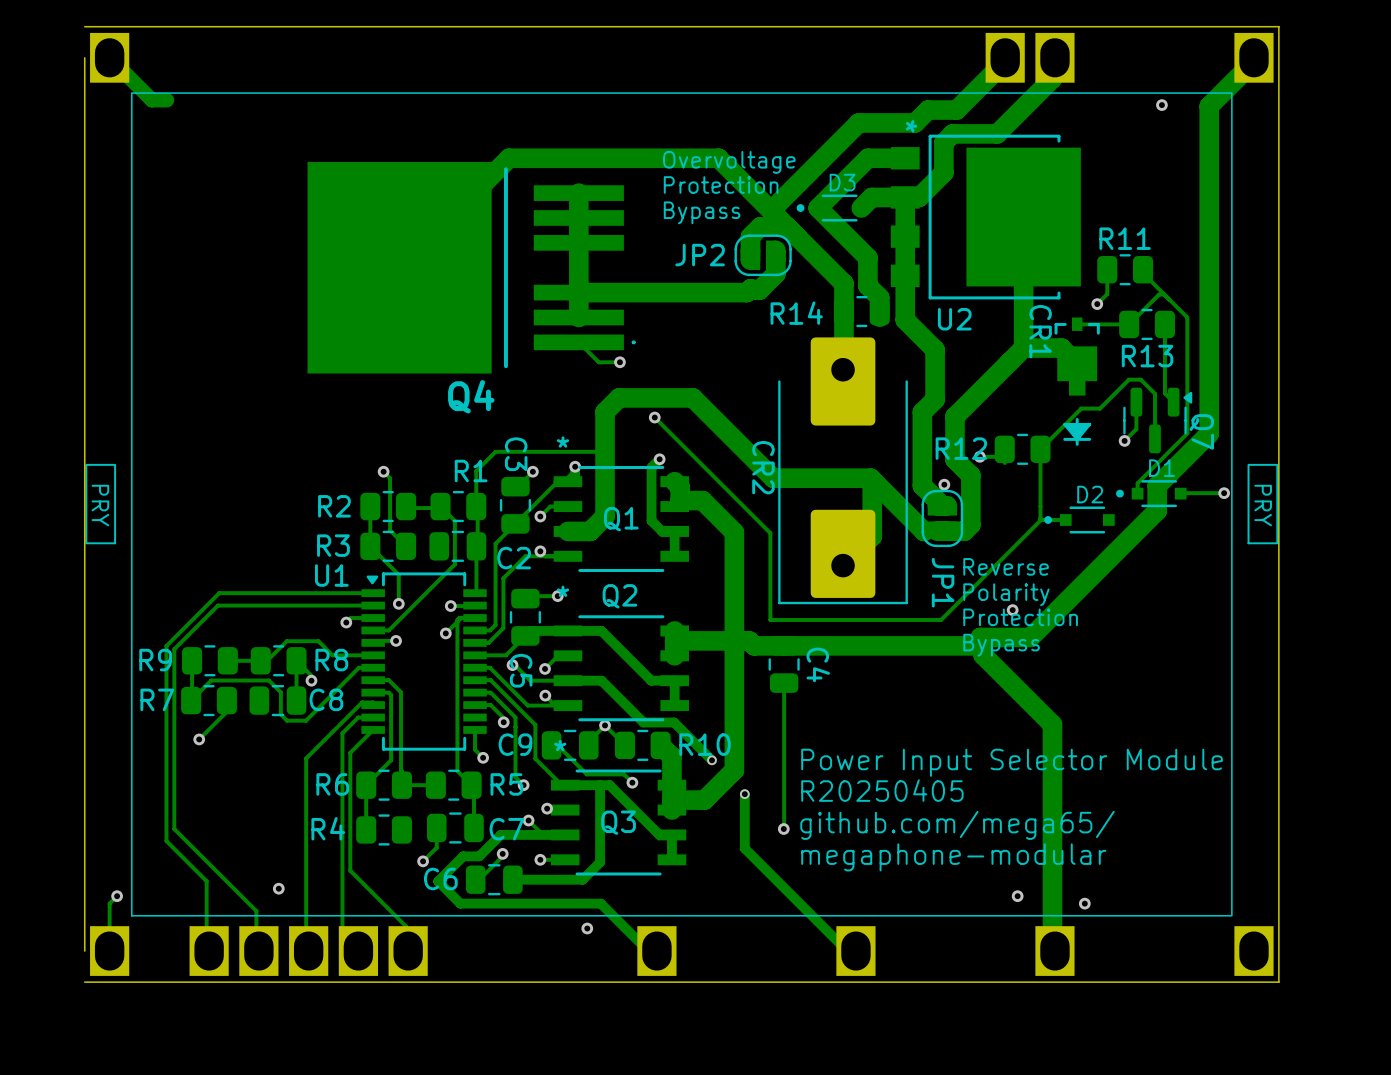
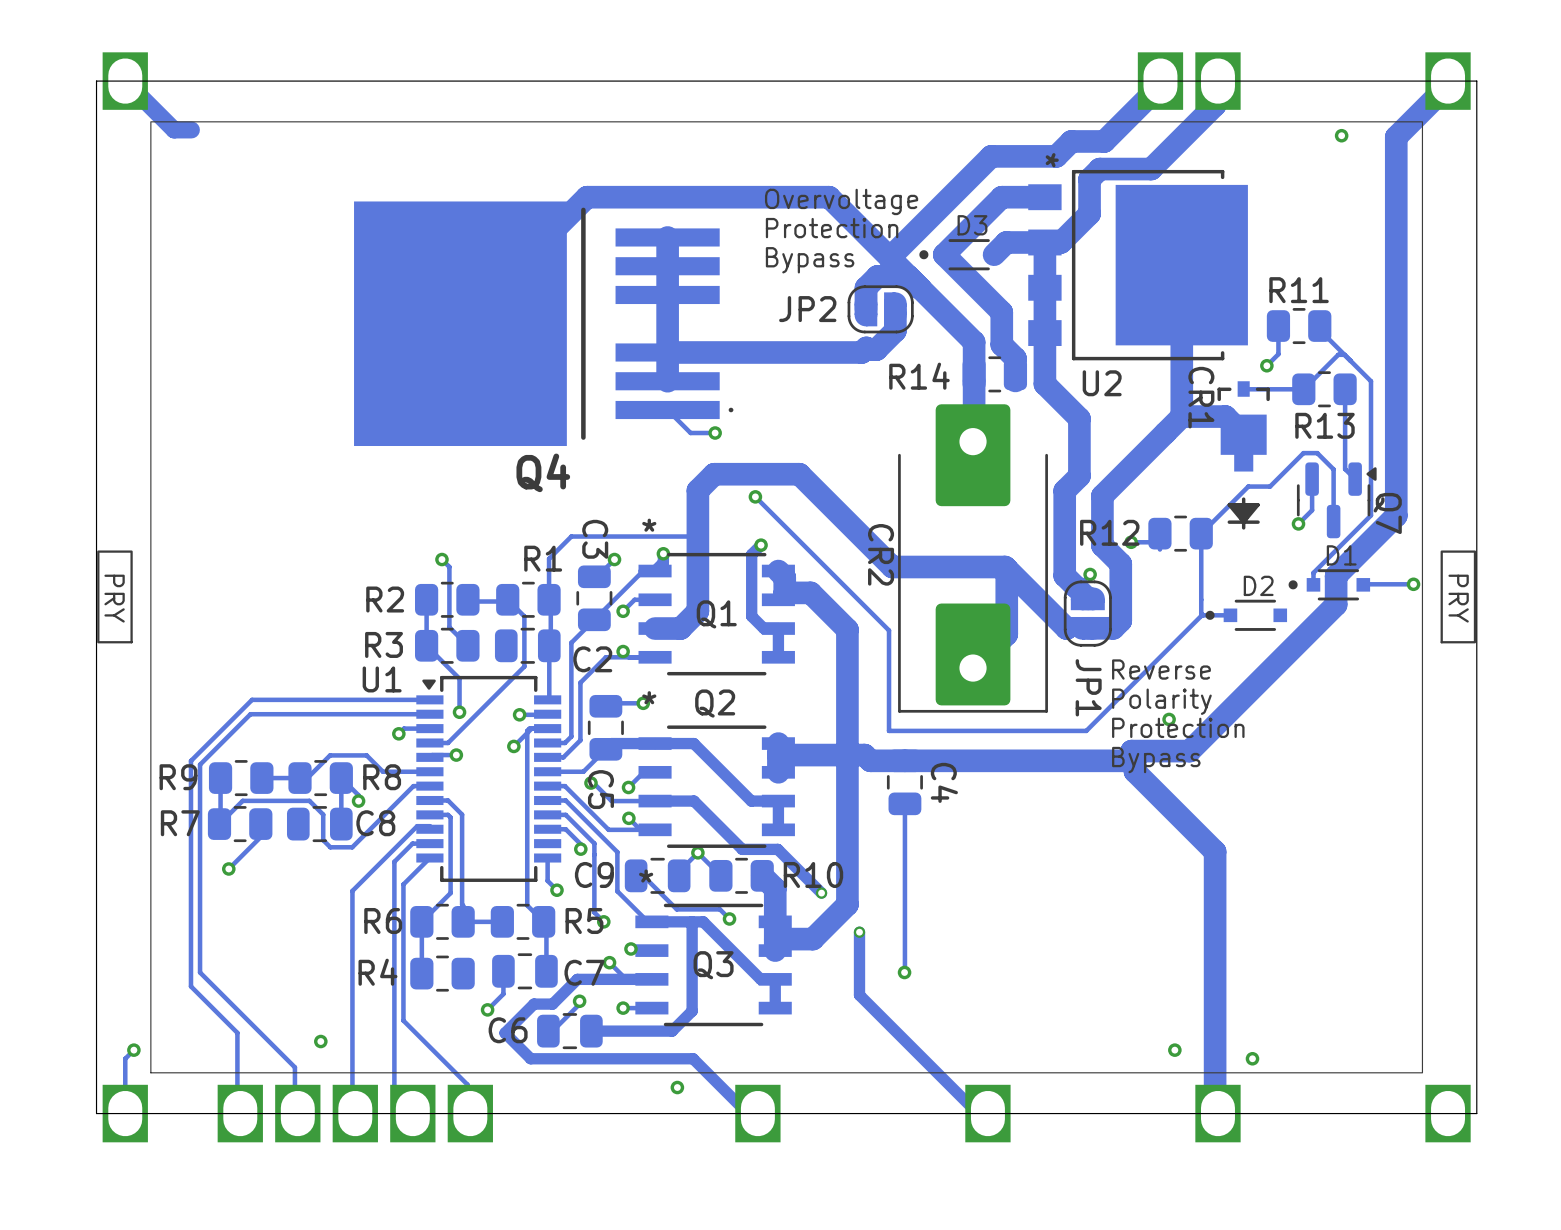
part footprint: [84, 26, 1280, 983] -> [95, 52, 1478, 1143]
text: Power Input Selector Module (1012, 762) -> none
text: R20250405 (882, 790) -> none
text: github.com/mega65/ (957, 825) -> none
text: megaphone-modular (953, 857) -> none

